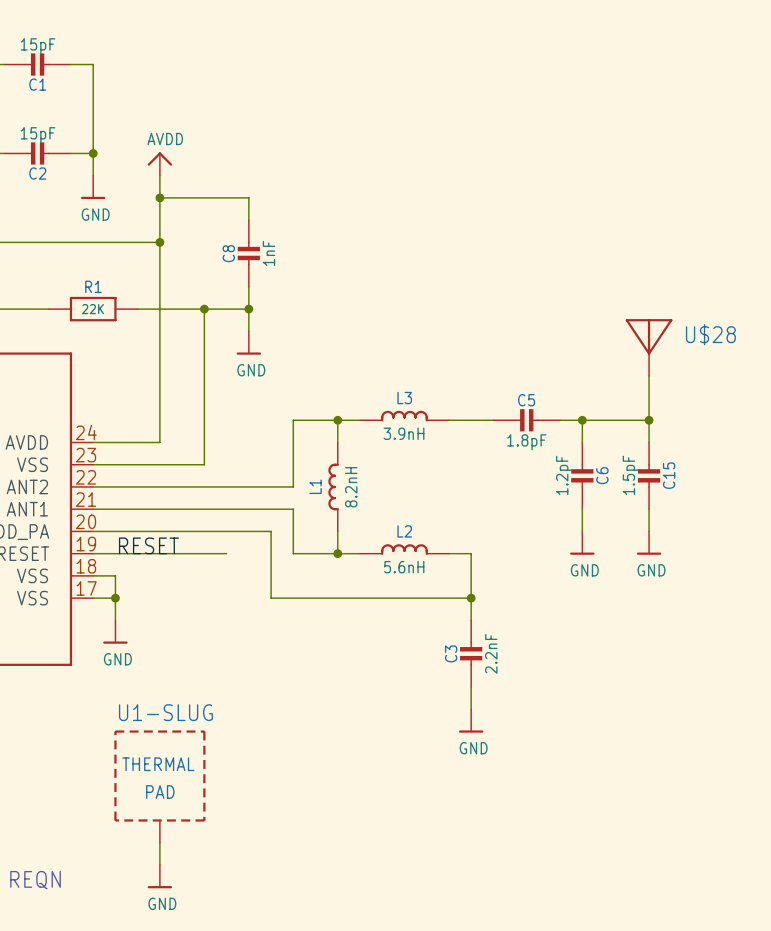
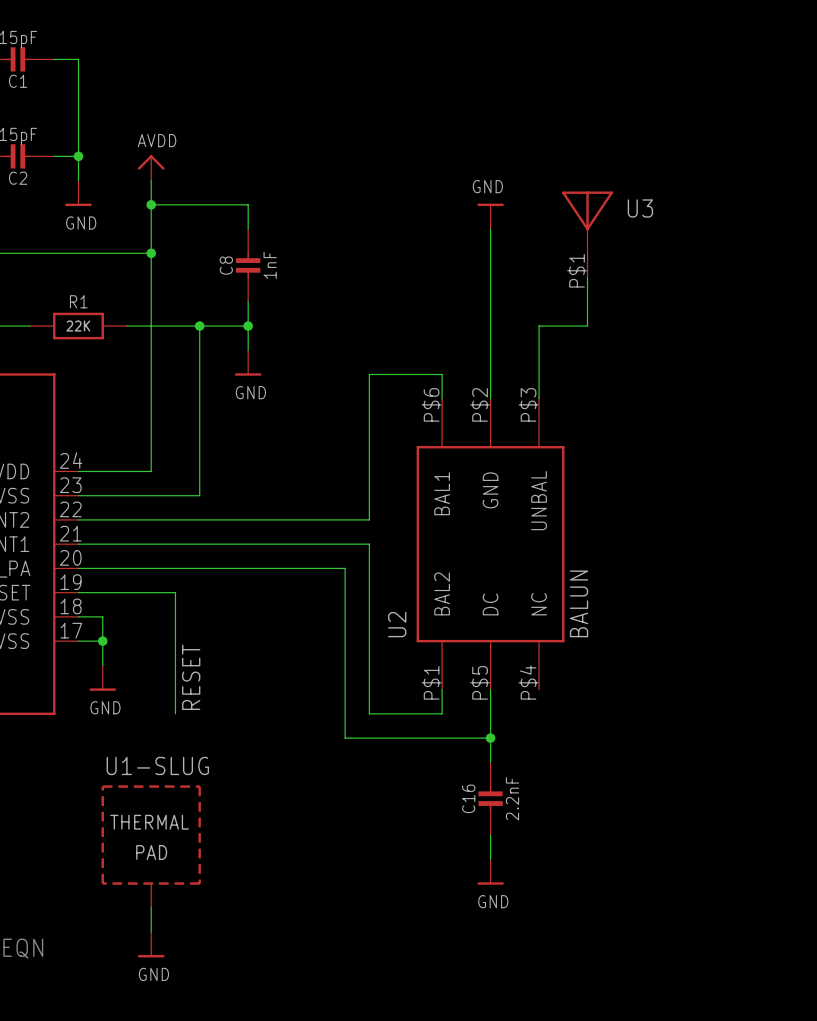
power symbol: none -> GND (490, 216)
wire: none -> (490, 229) (490, 398)
U3: none -> (587, 234)
wire: none -> (587, 277) (587, 326) (539, 326) (539, 398)
U$28: (649, 347) -> none
wire: (649, 375) (649, 442) -> none
L3: 3.9nH (404, 416) -> none
wire: (337, 420) (337, 442) -> none
junction: (337, 420) -> none
wire: (360, 420) (293, 420) (293, 486) -> (442, 398) (442, 374) (369, 374) (369, 519) (296, 519)
C5: 1.8pF (526, 420) -> none
wire: (560, 420) (649, 420) -> none
wire: (582, 420) (582, 442) -> none
junction: (582, 420) -> none
junction: (649, 420) -> none
C6: 1.2pF (582, 475) -> none
C15: 1.5pF (649, 475) -> none
L1: 8.2nH (333, 486) -> none
wire: (293, 509) (293, 553) (360, 553) -> (296, 544) (369, 544) (369, 713) (442, 713) (442, 689)
U2: none -> (490, 544)
wire: (582, 509) (582, 531) -> none
wire: (649, 509) (649, 531) -> none
wire: (271, 531) (271, 598) (471, 598) -> (272, 568) (345, 568)
power symbol: GND (582, 543) -> none
power symbol: GND (649, 543) -> none
label rotation: 0° (148, 545) -> 90° counterclockwise (191, 677)
label position: RESET (148, 545) -> RESET (191, 677)
L2: 5.6nH (404, 549) -> none
wire: (182, 553) (226, 553) -> (175, 592) (175, 713)
wire: none -> (345, 592) (345, 738) (490, 738) (490, 689)
junction: (337, 553) -> none
wire: (448, 553) (471, 553) (471, 620) -> none
text: none -> BALUN (579, 603)
junction: (471, 598) -> none
C3: 2.2nF (471, 653) -> none
junction: none -> (490, 738)
power symbol position: GND (471, 720) -> GND (490, 872)
C16: none -> 2.2nF (490, 798)
wire: none -> (490, 835) (490, 859)

